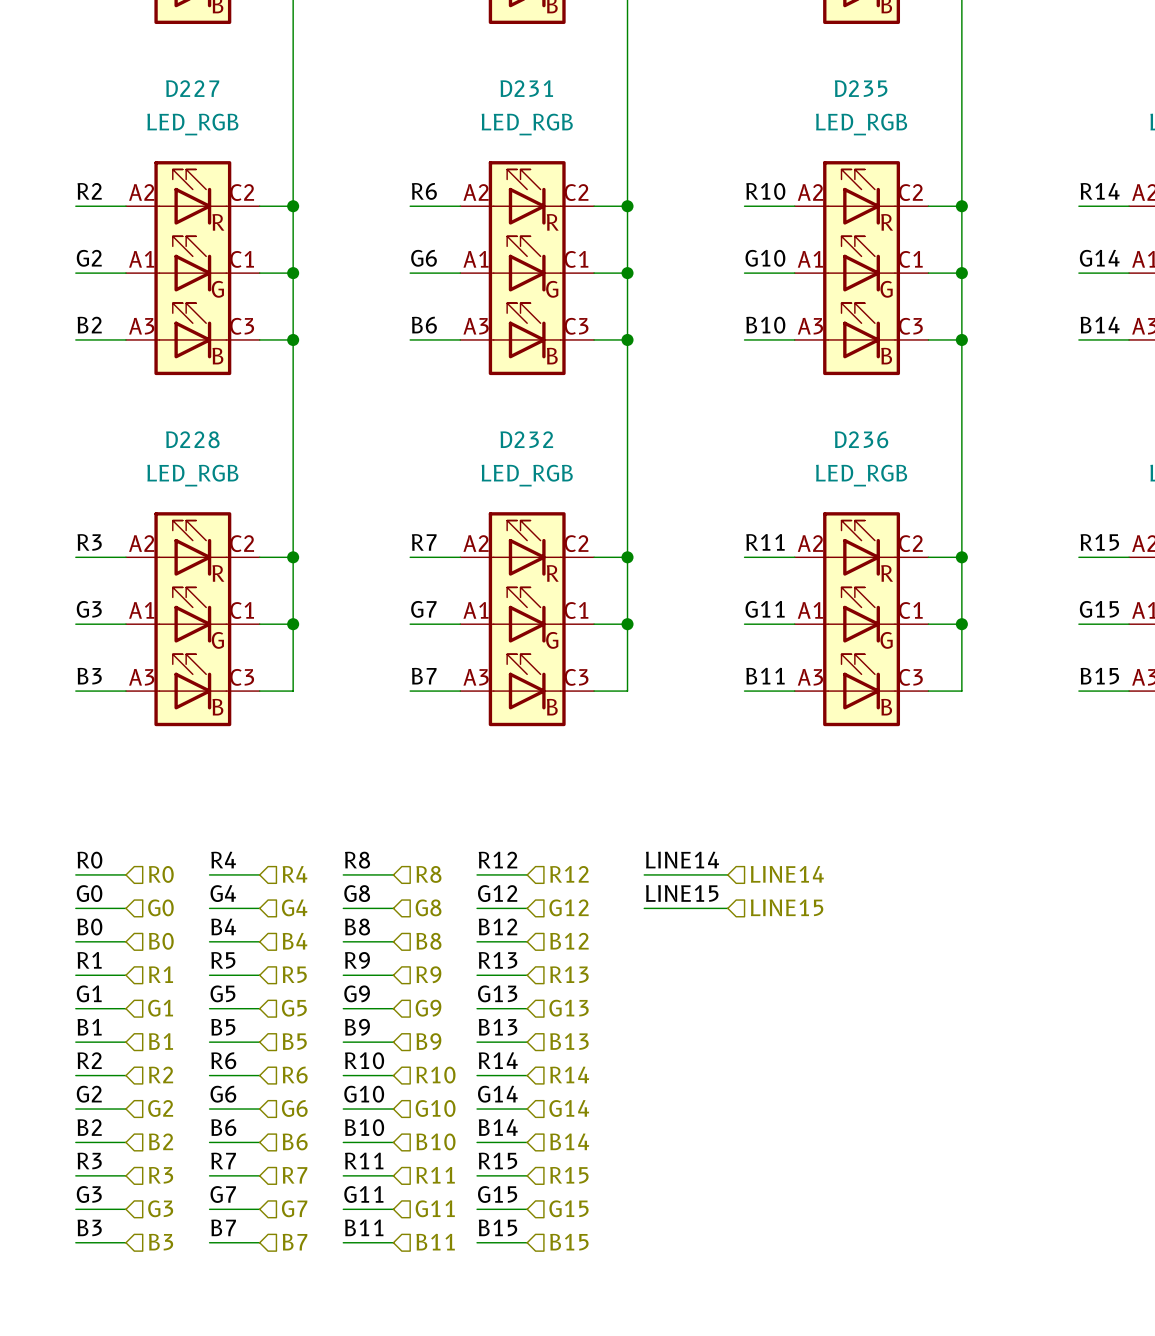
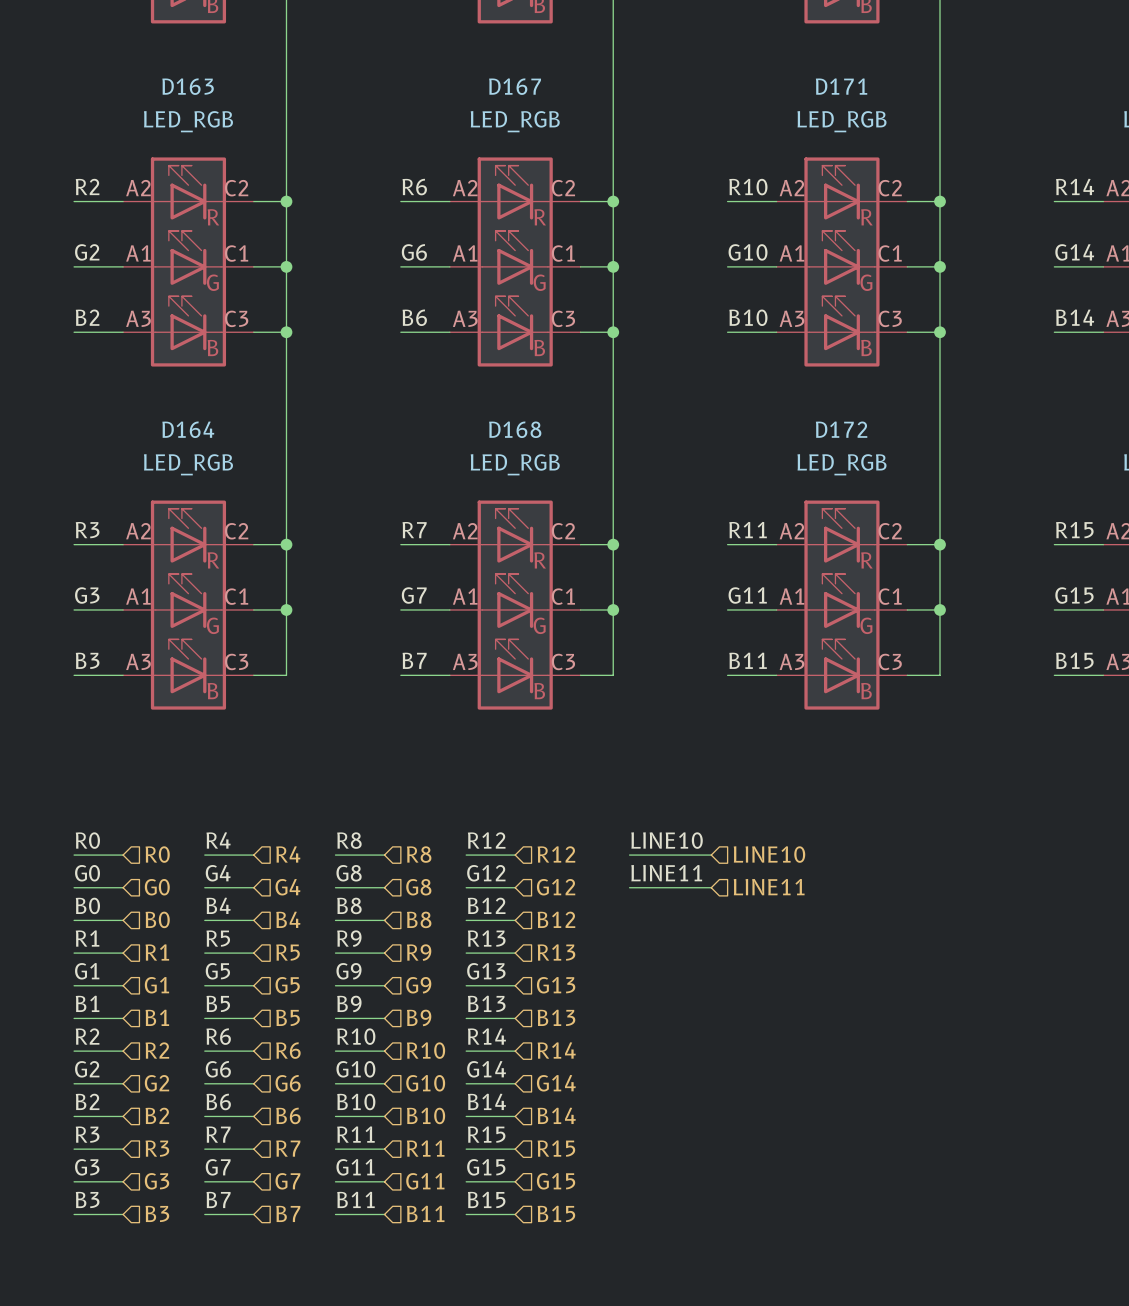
D227 name: D227 (192, 88) -> D163 (188, 86)
D231 name: D231 (526, 88) -> D167 (515, 86)
D235 name: D235 (861, 88) -> D171 (841, 86)
D228 name: D228 (192, 439) -> D164 (188, 429)
D232 name: D232 (526, 439) -> D168 (515, 429)
D236 name: D236 (861, 439) -> D172 (841, 429)
label: LINE14 (682, 860) -> LINE10 (667, 840)
hierarchical label: LINE14 (787, 874) -> LINE10 (769, 854)
label: LINE15 (682, 893) -> LINE11 (666, 873)
hierarchical label: LINE15 (787, 907) -> LINE11 (769, 887)

